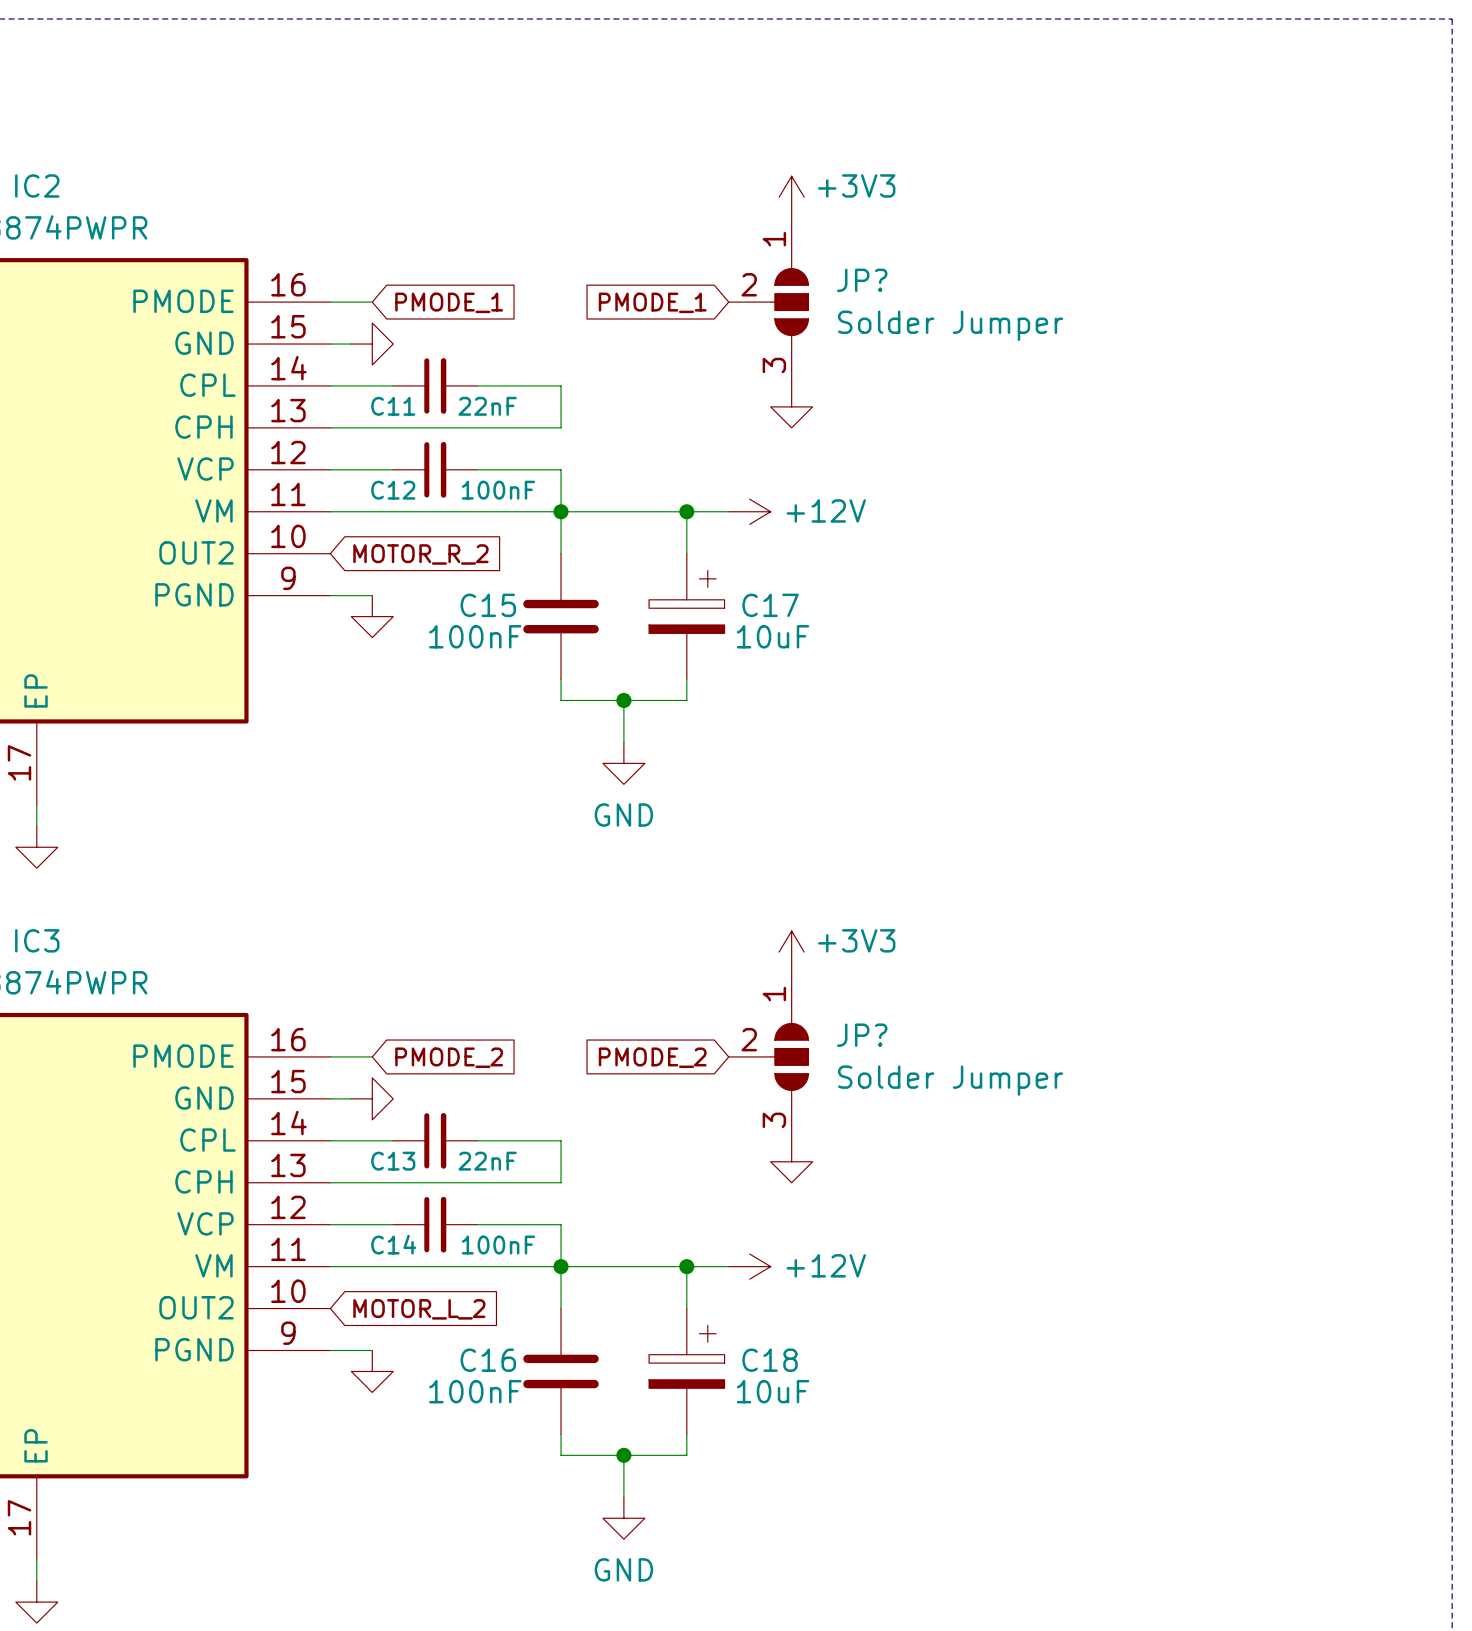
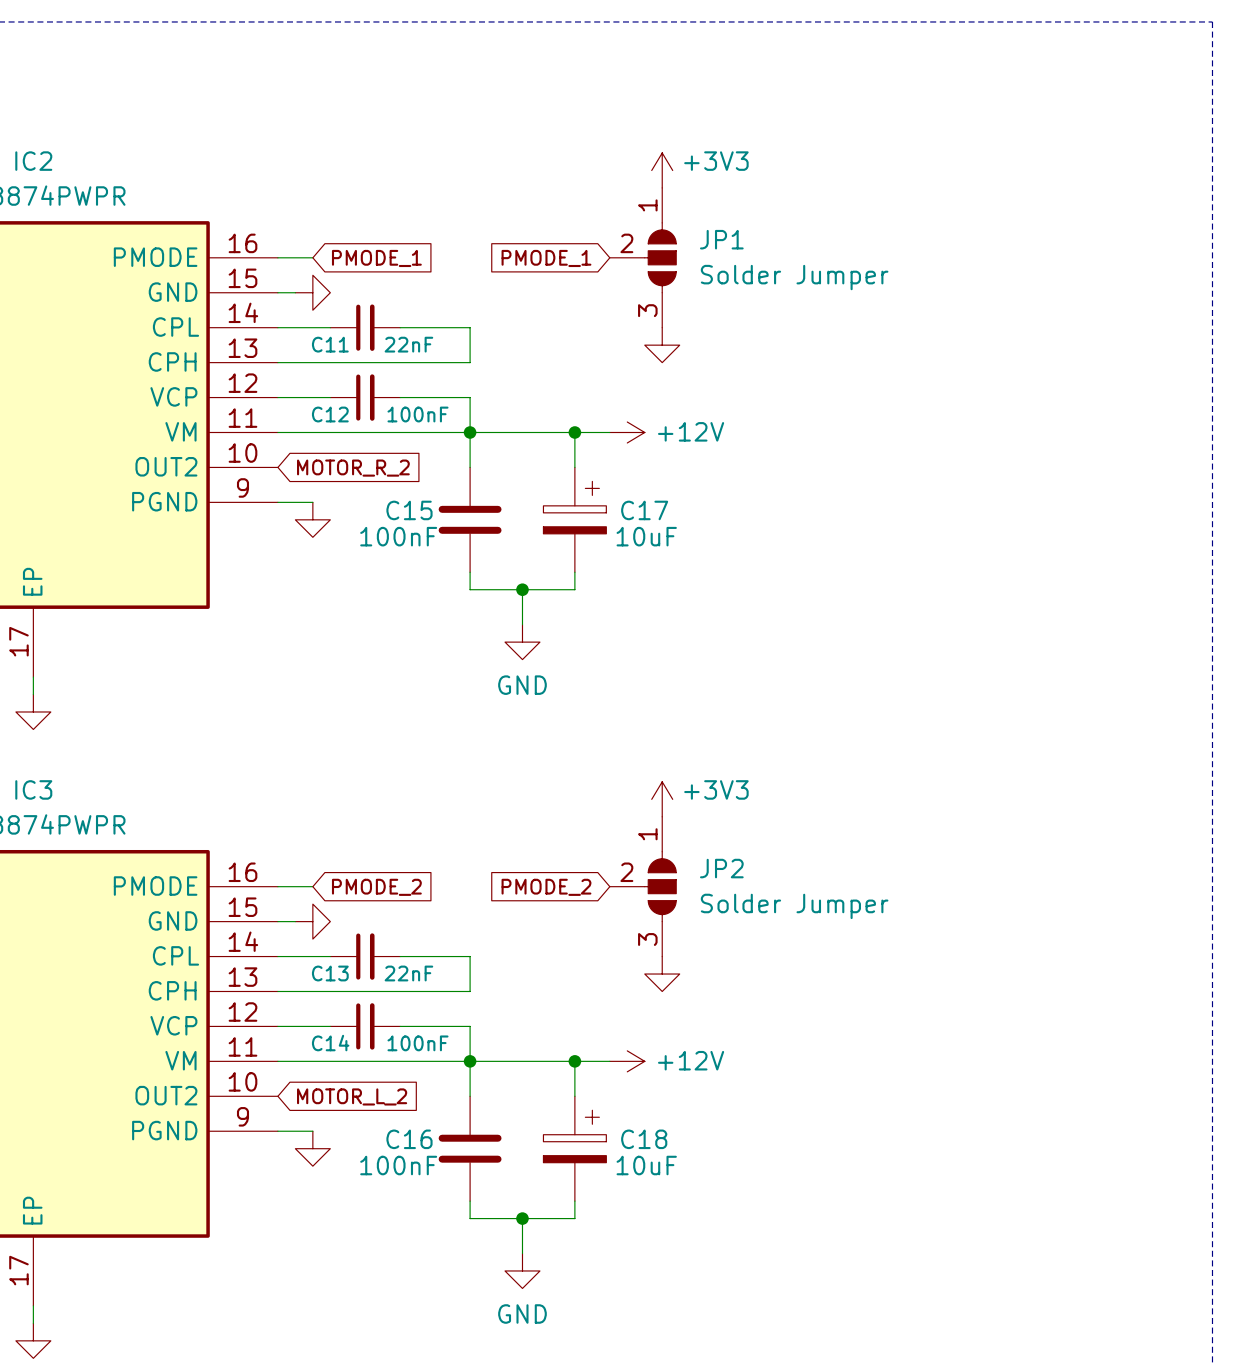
JP? name: JP? (862, 280) -> JP1 (721, 239)
JP? name: JP? (862, 1035) -> JP2 (721, 868)

